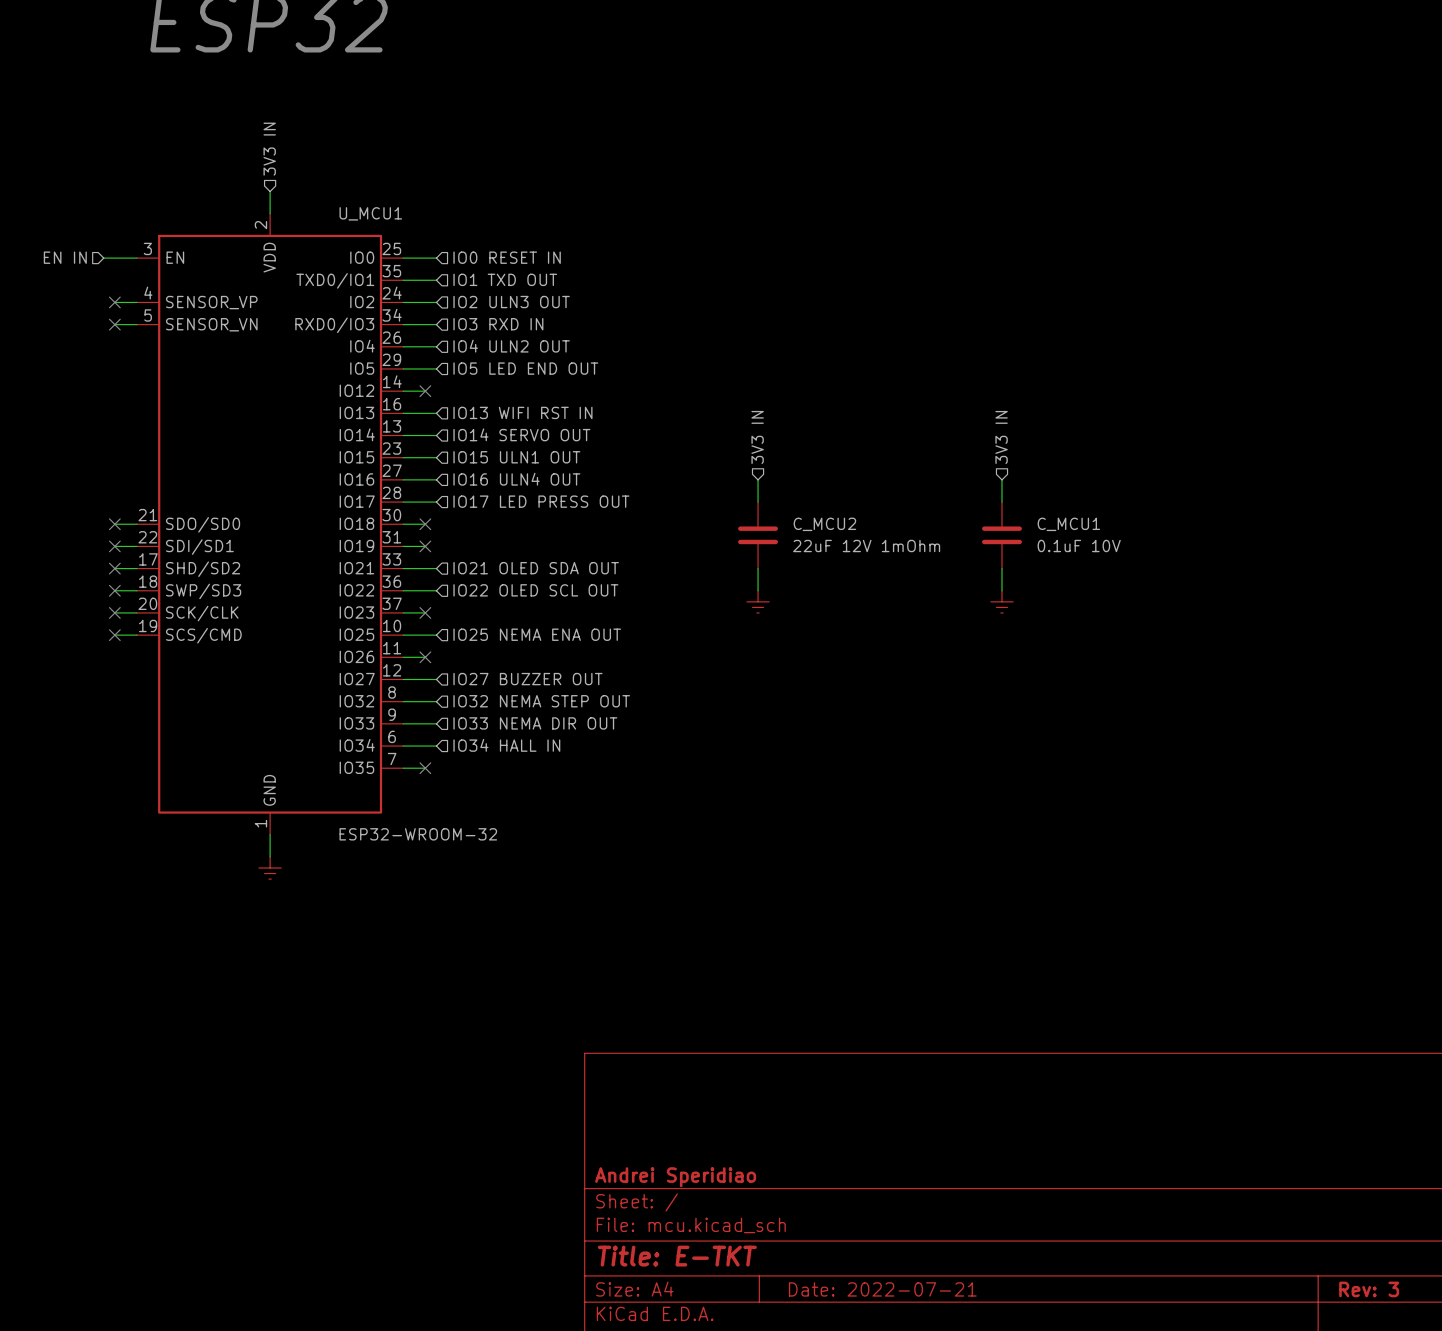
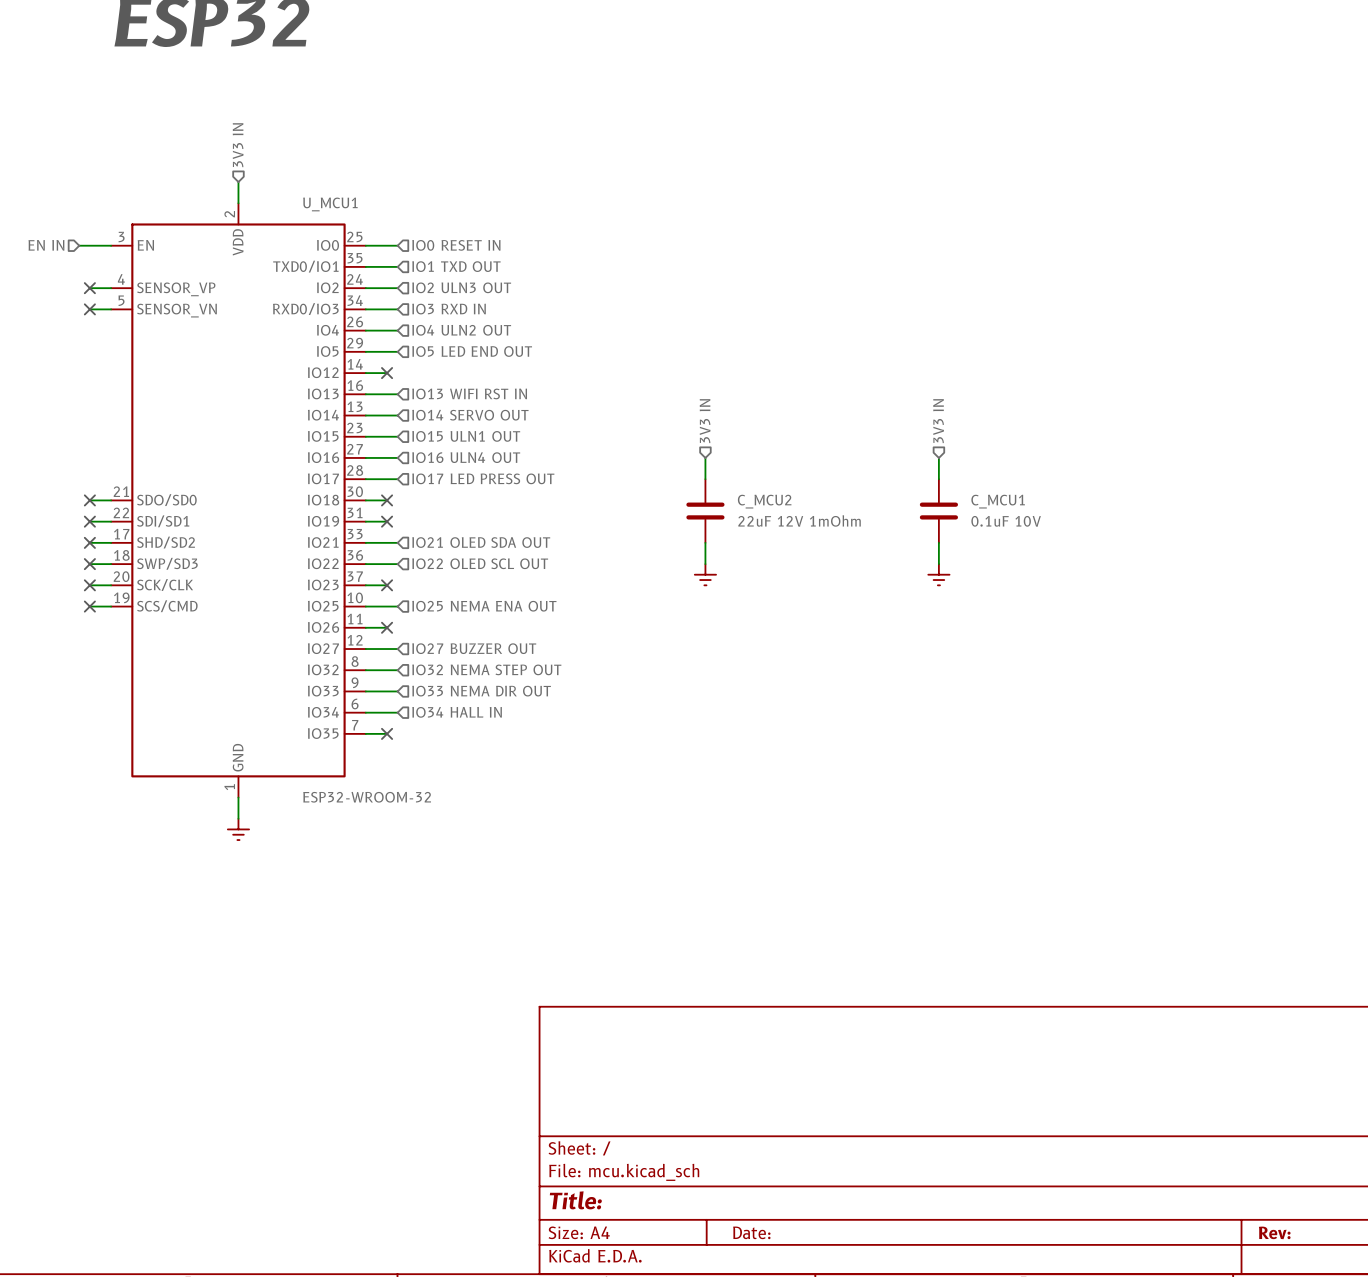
title block: Andrei Speridiao (675, 1177) -> none
title block: Title: E-TKT (677, 1256) -> Title: (575, 1200)
title block: Date: 2022-07-21 (882, 1289) -> Date: (751, 1232)
title block: Rev: 3 (1369, 1289) -> Rev: (1274, 1232)

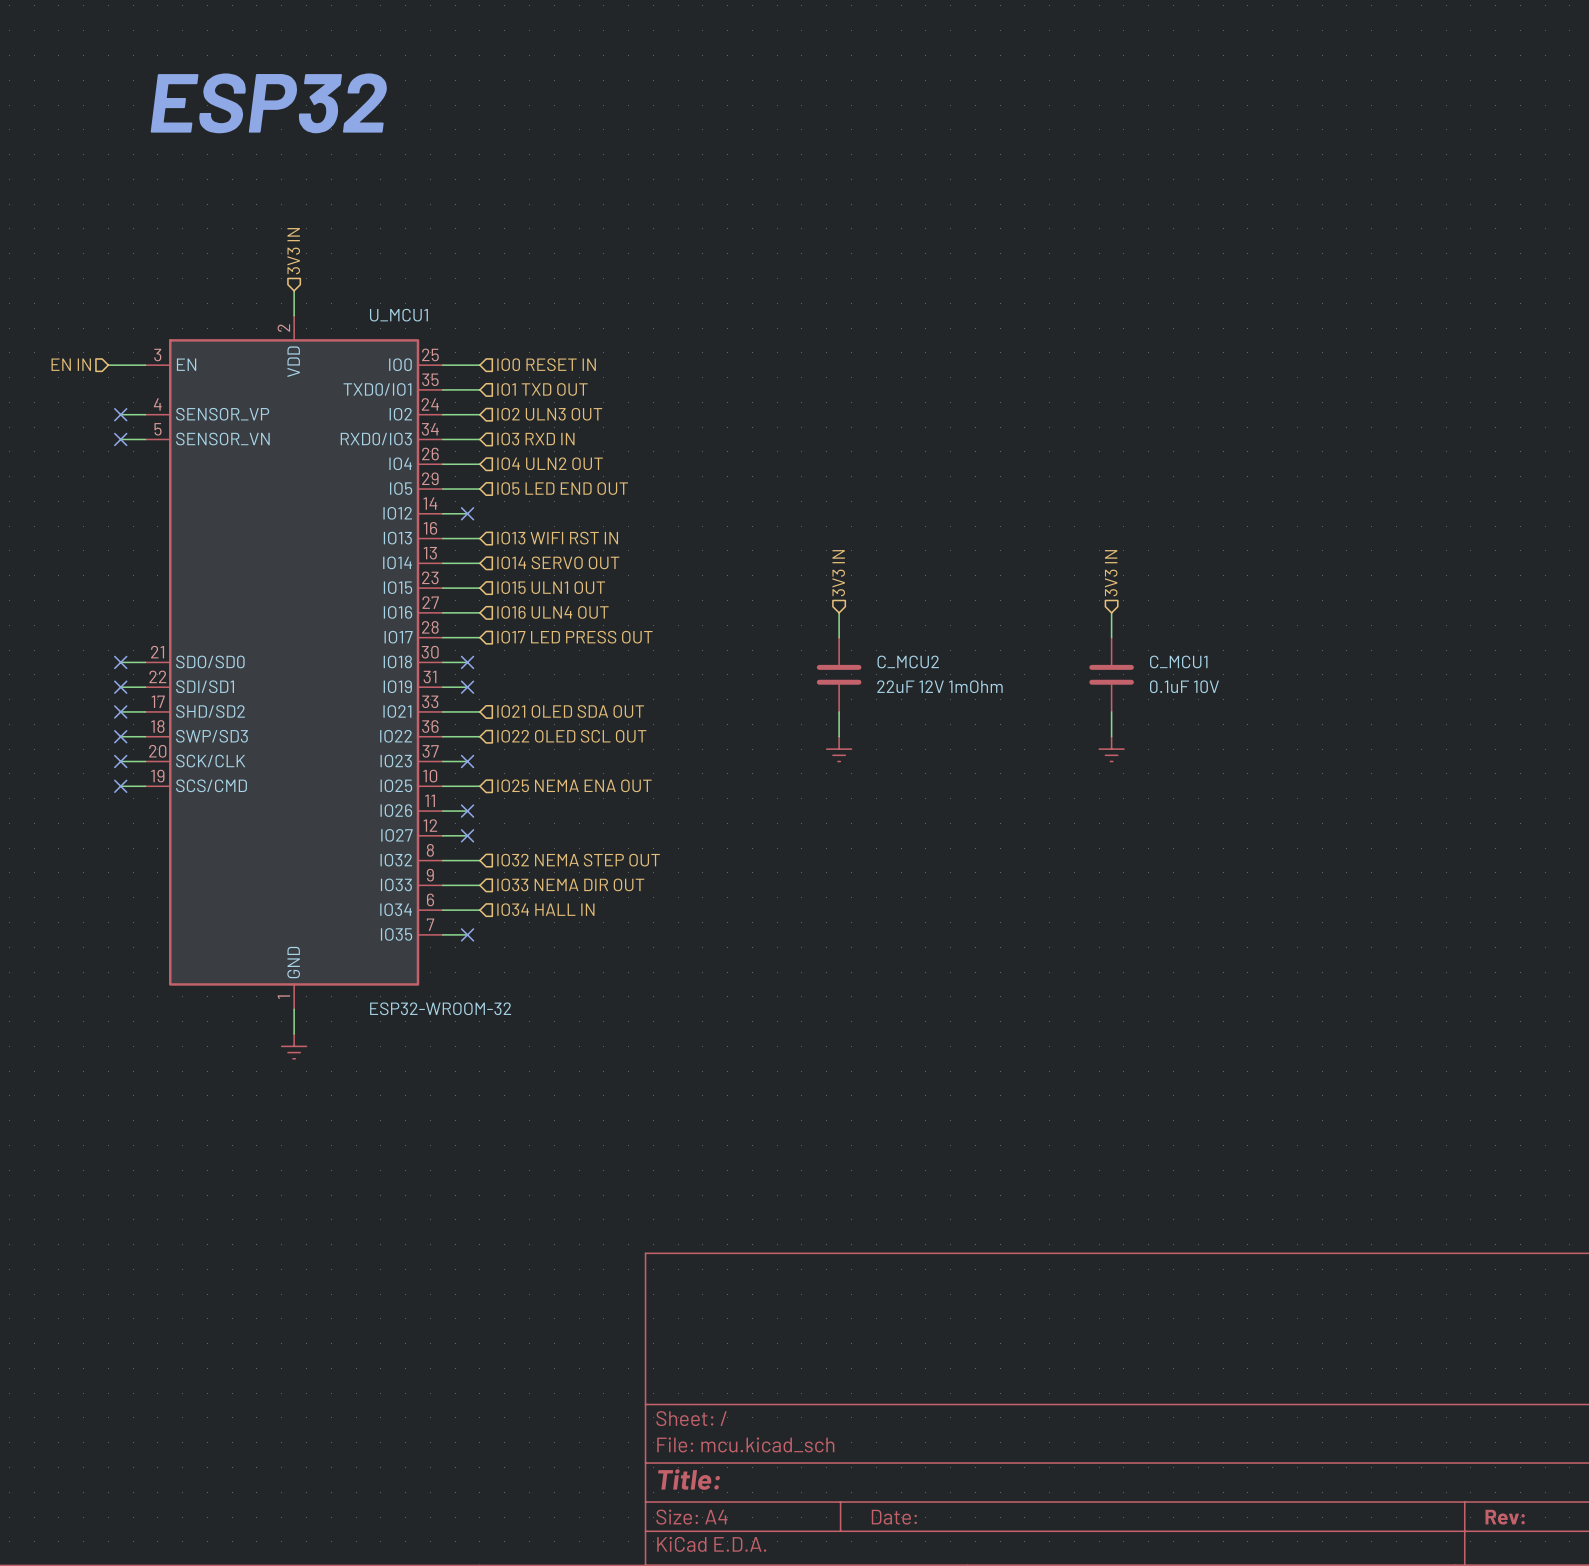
hierarchical label: IO27 BUZZER OUT (474, 648) -> none
wire: (387, 649) (397, 649) -> none
no-connect mark: none -> (467, 835)

